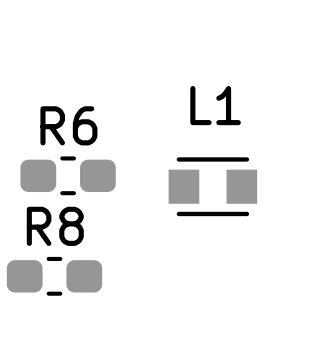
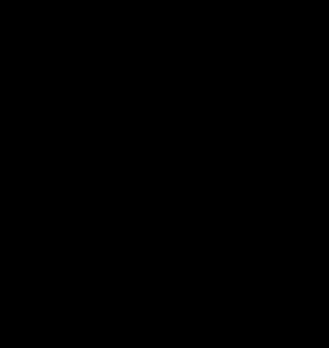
R6: (68, 175) -> none
L1: (212, 186) -> none
R8: (54, 276) -> none

